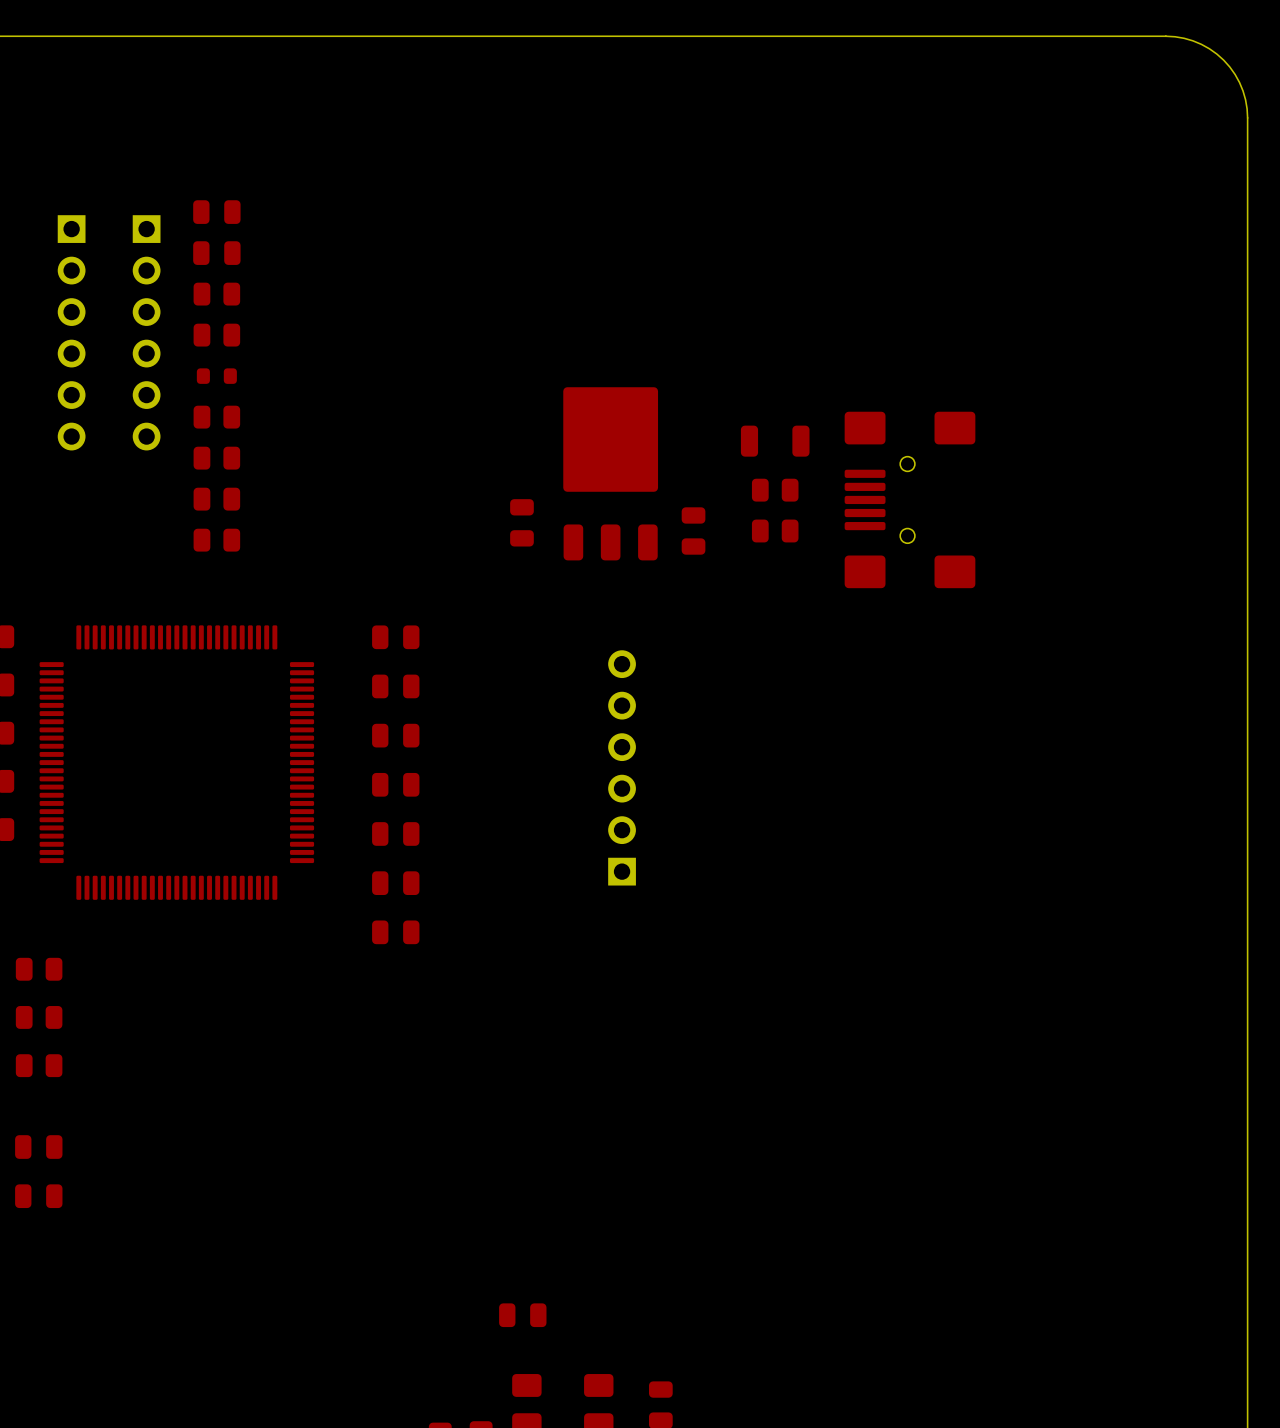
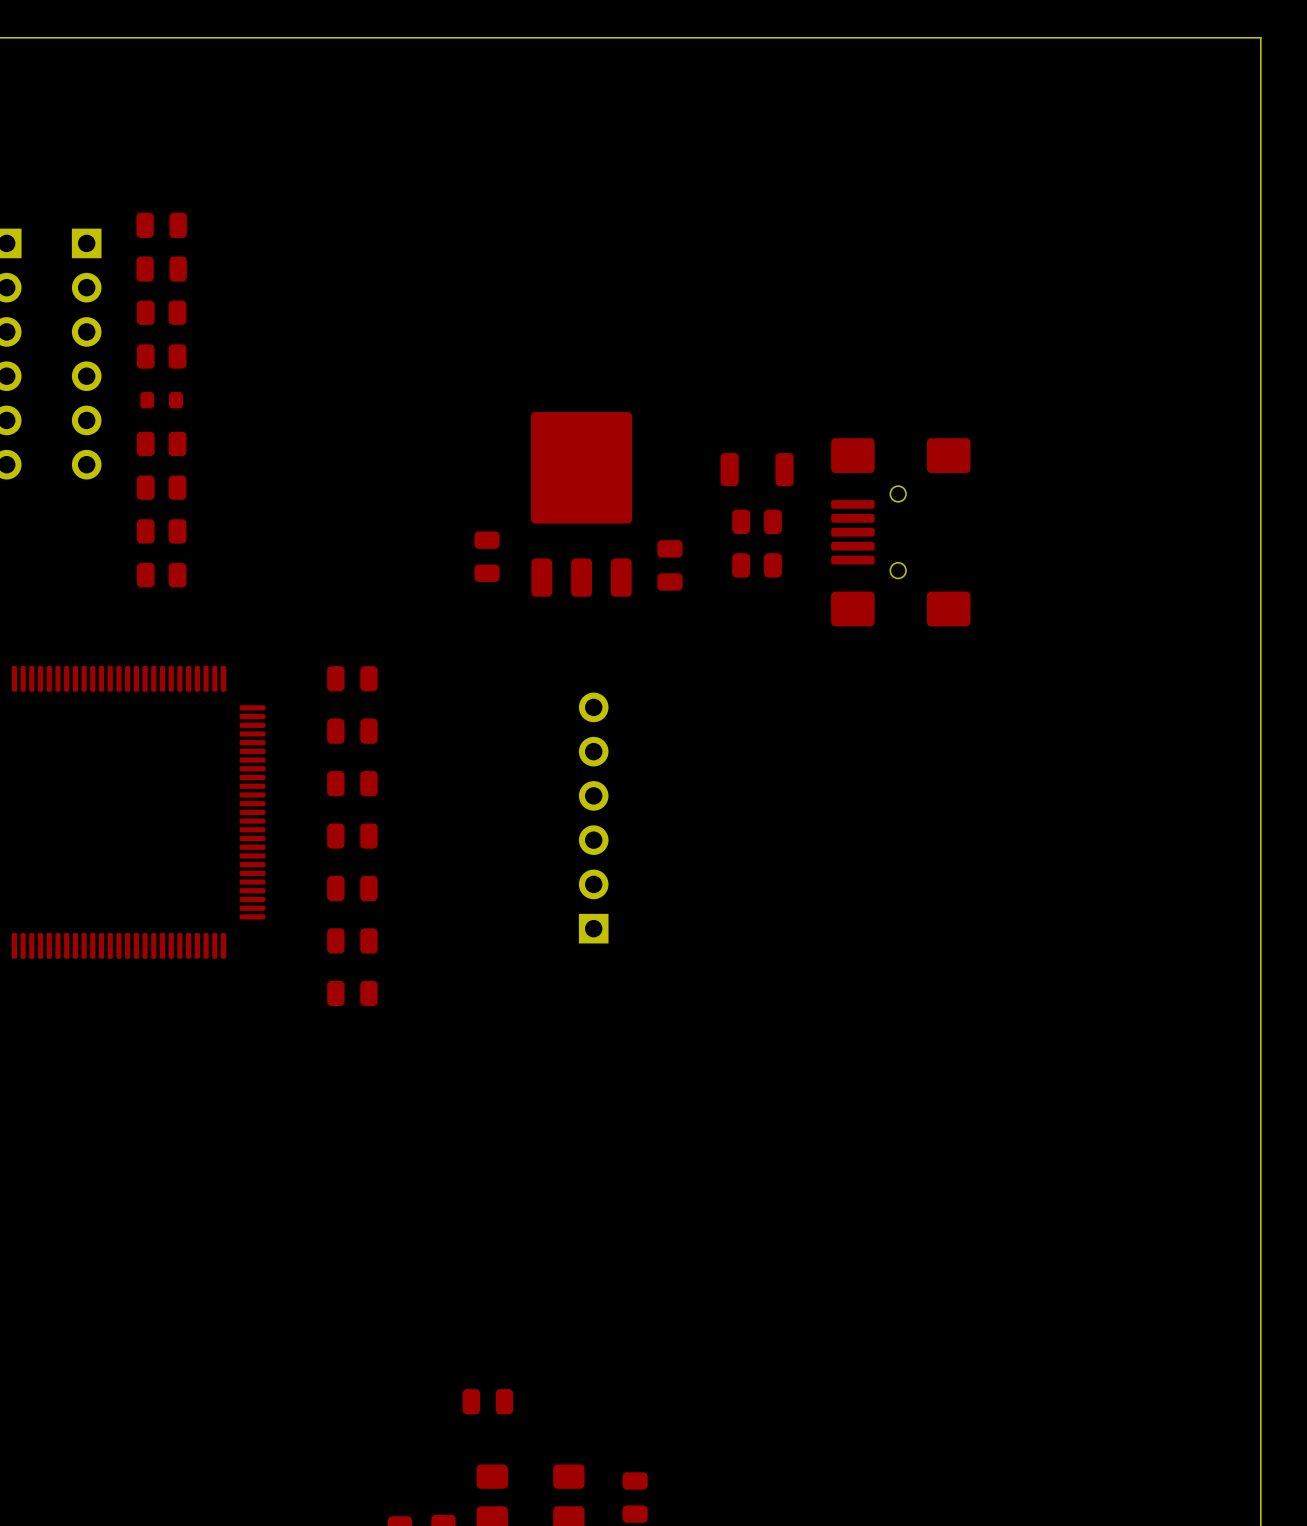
board edge: (1165, 36) (1184, 38) (1201, 44) (1223, 60) (1239, 82) (1245, 99) (1247, 117) -> (1173, 37) (1260, 37) (1260, 124)

